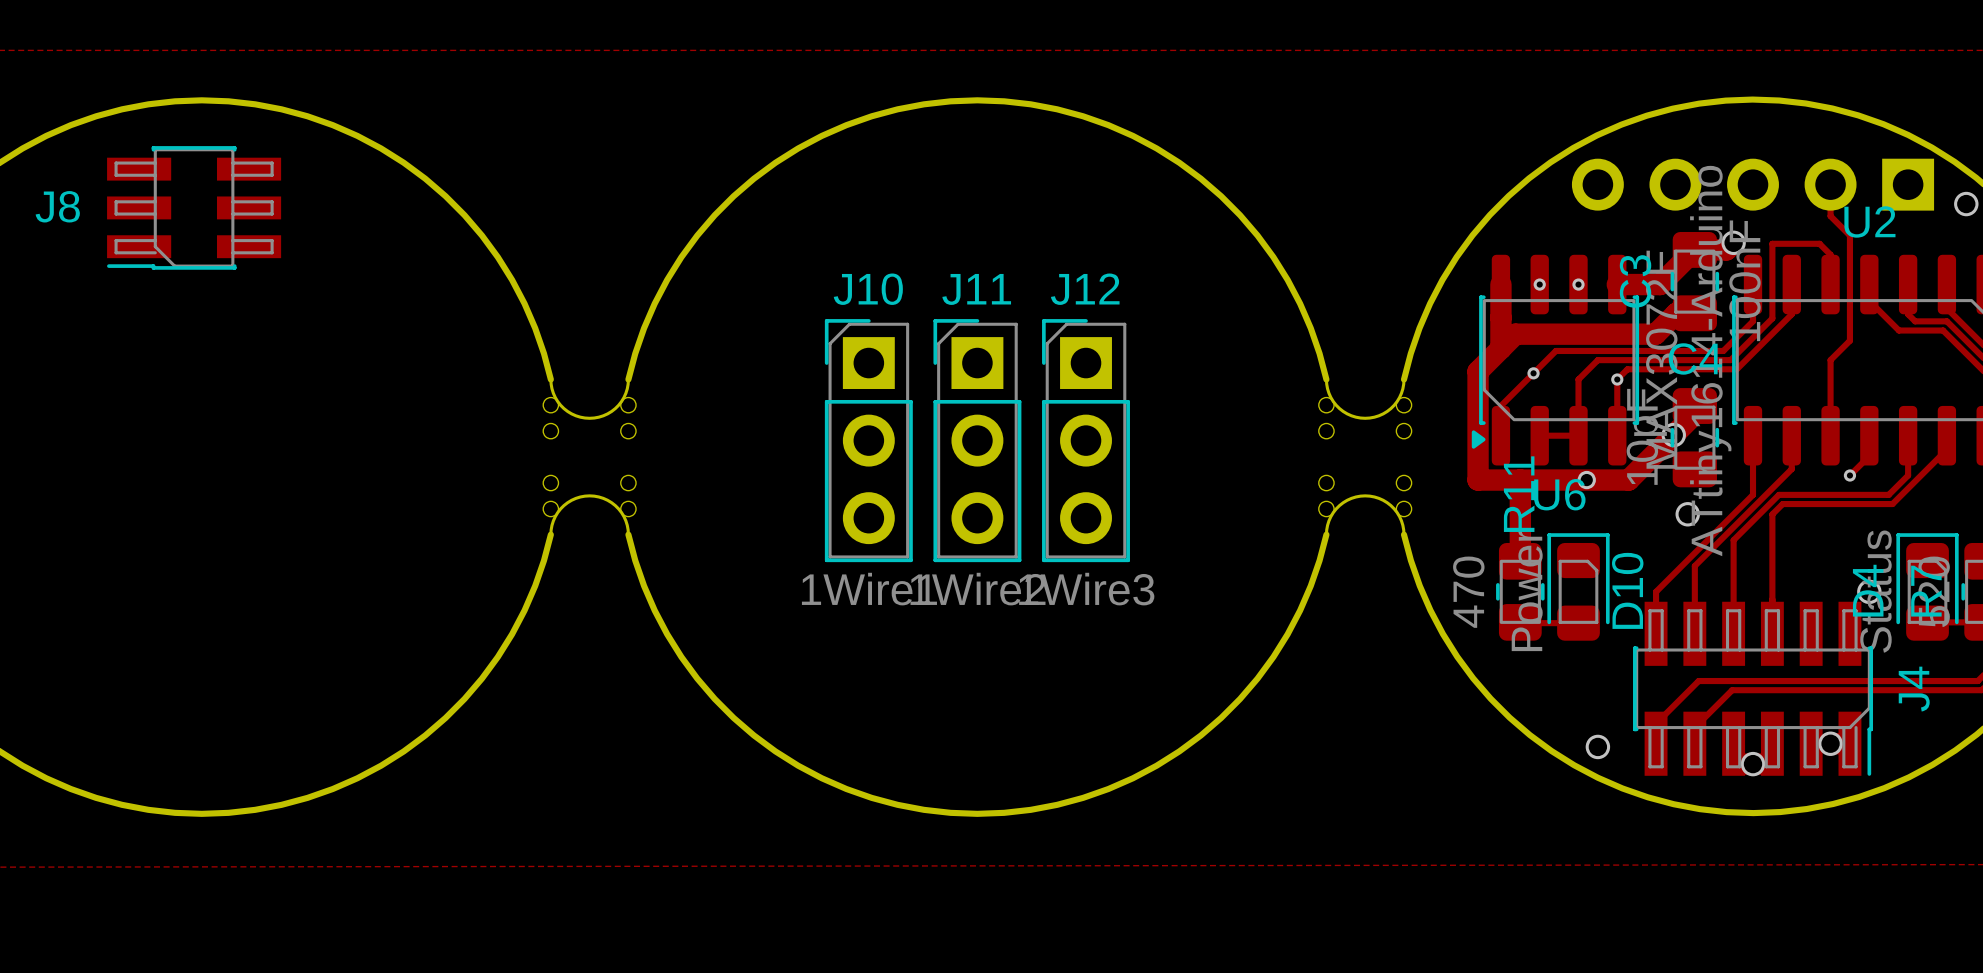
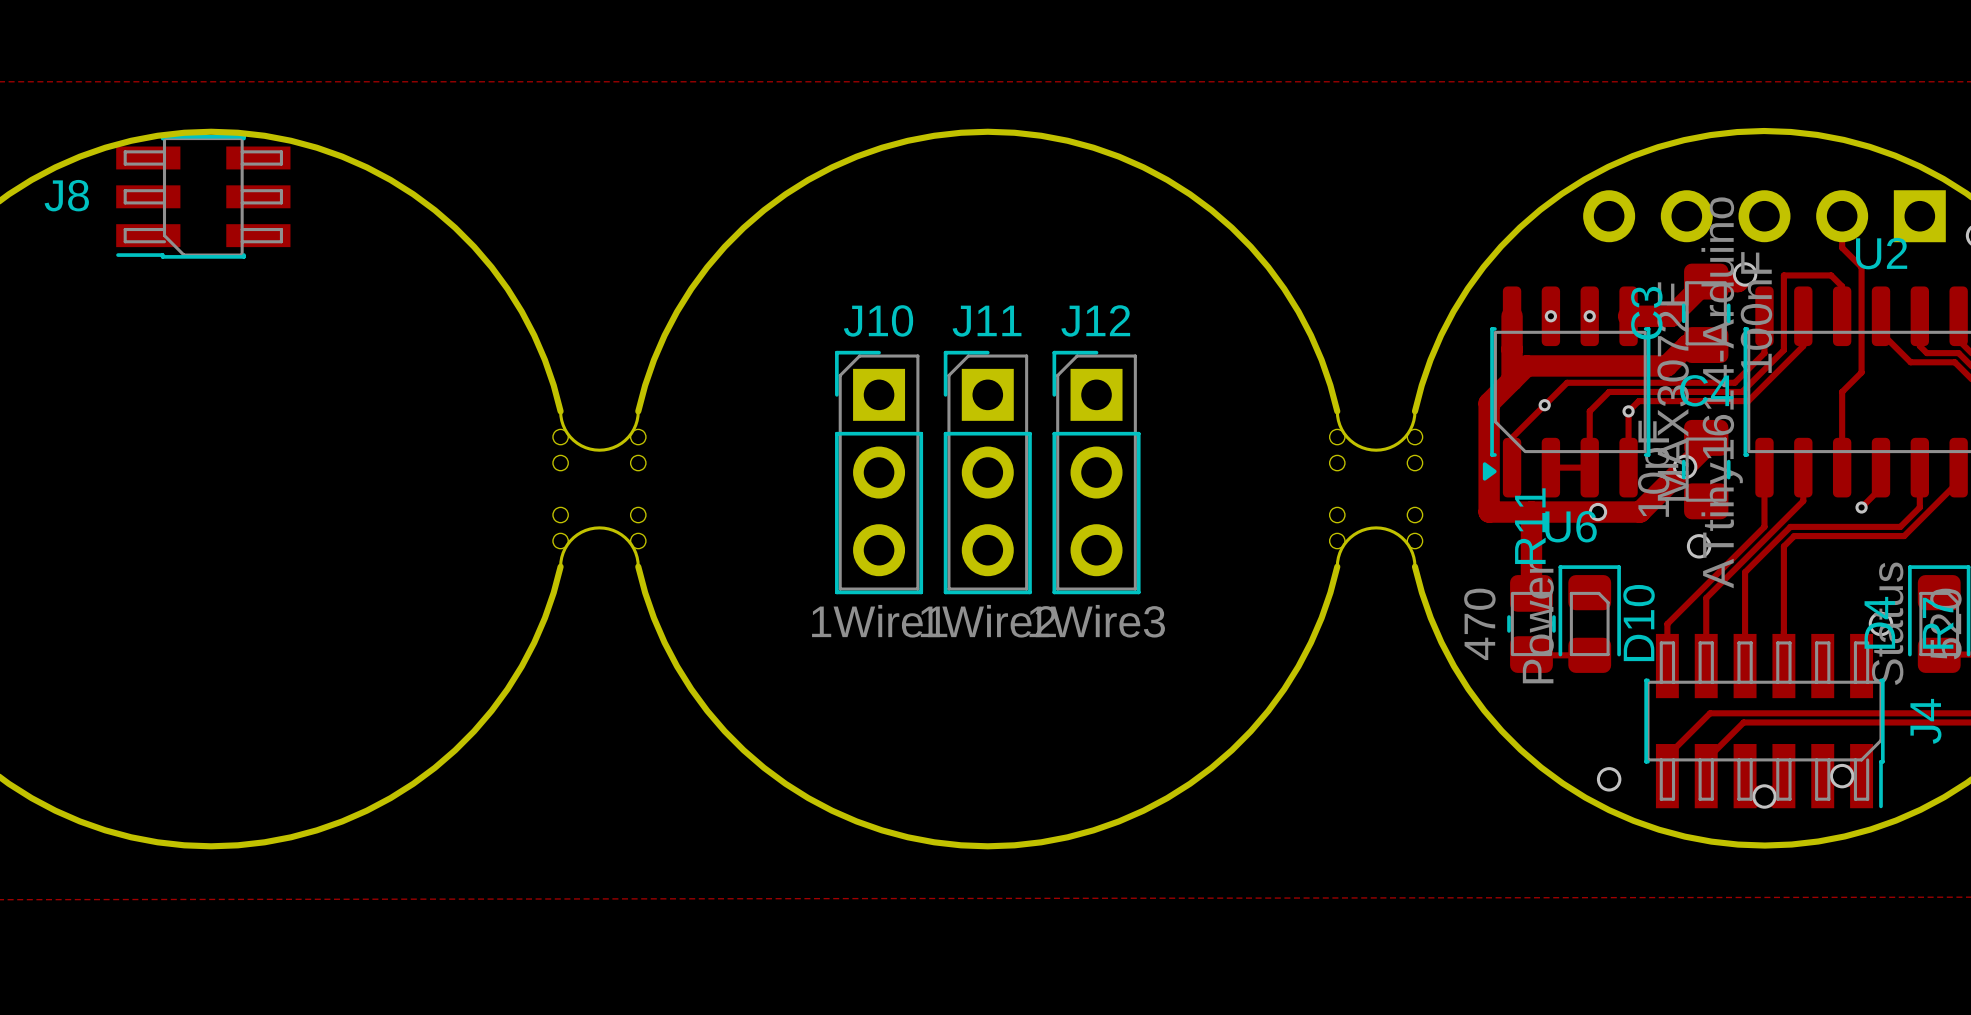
J8 position: (194, 207) -> (203, 196)

